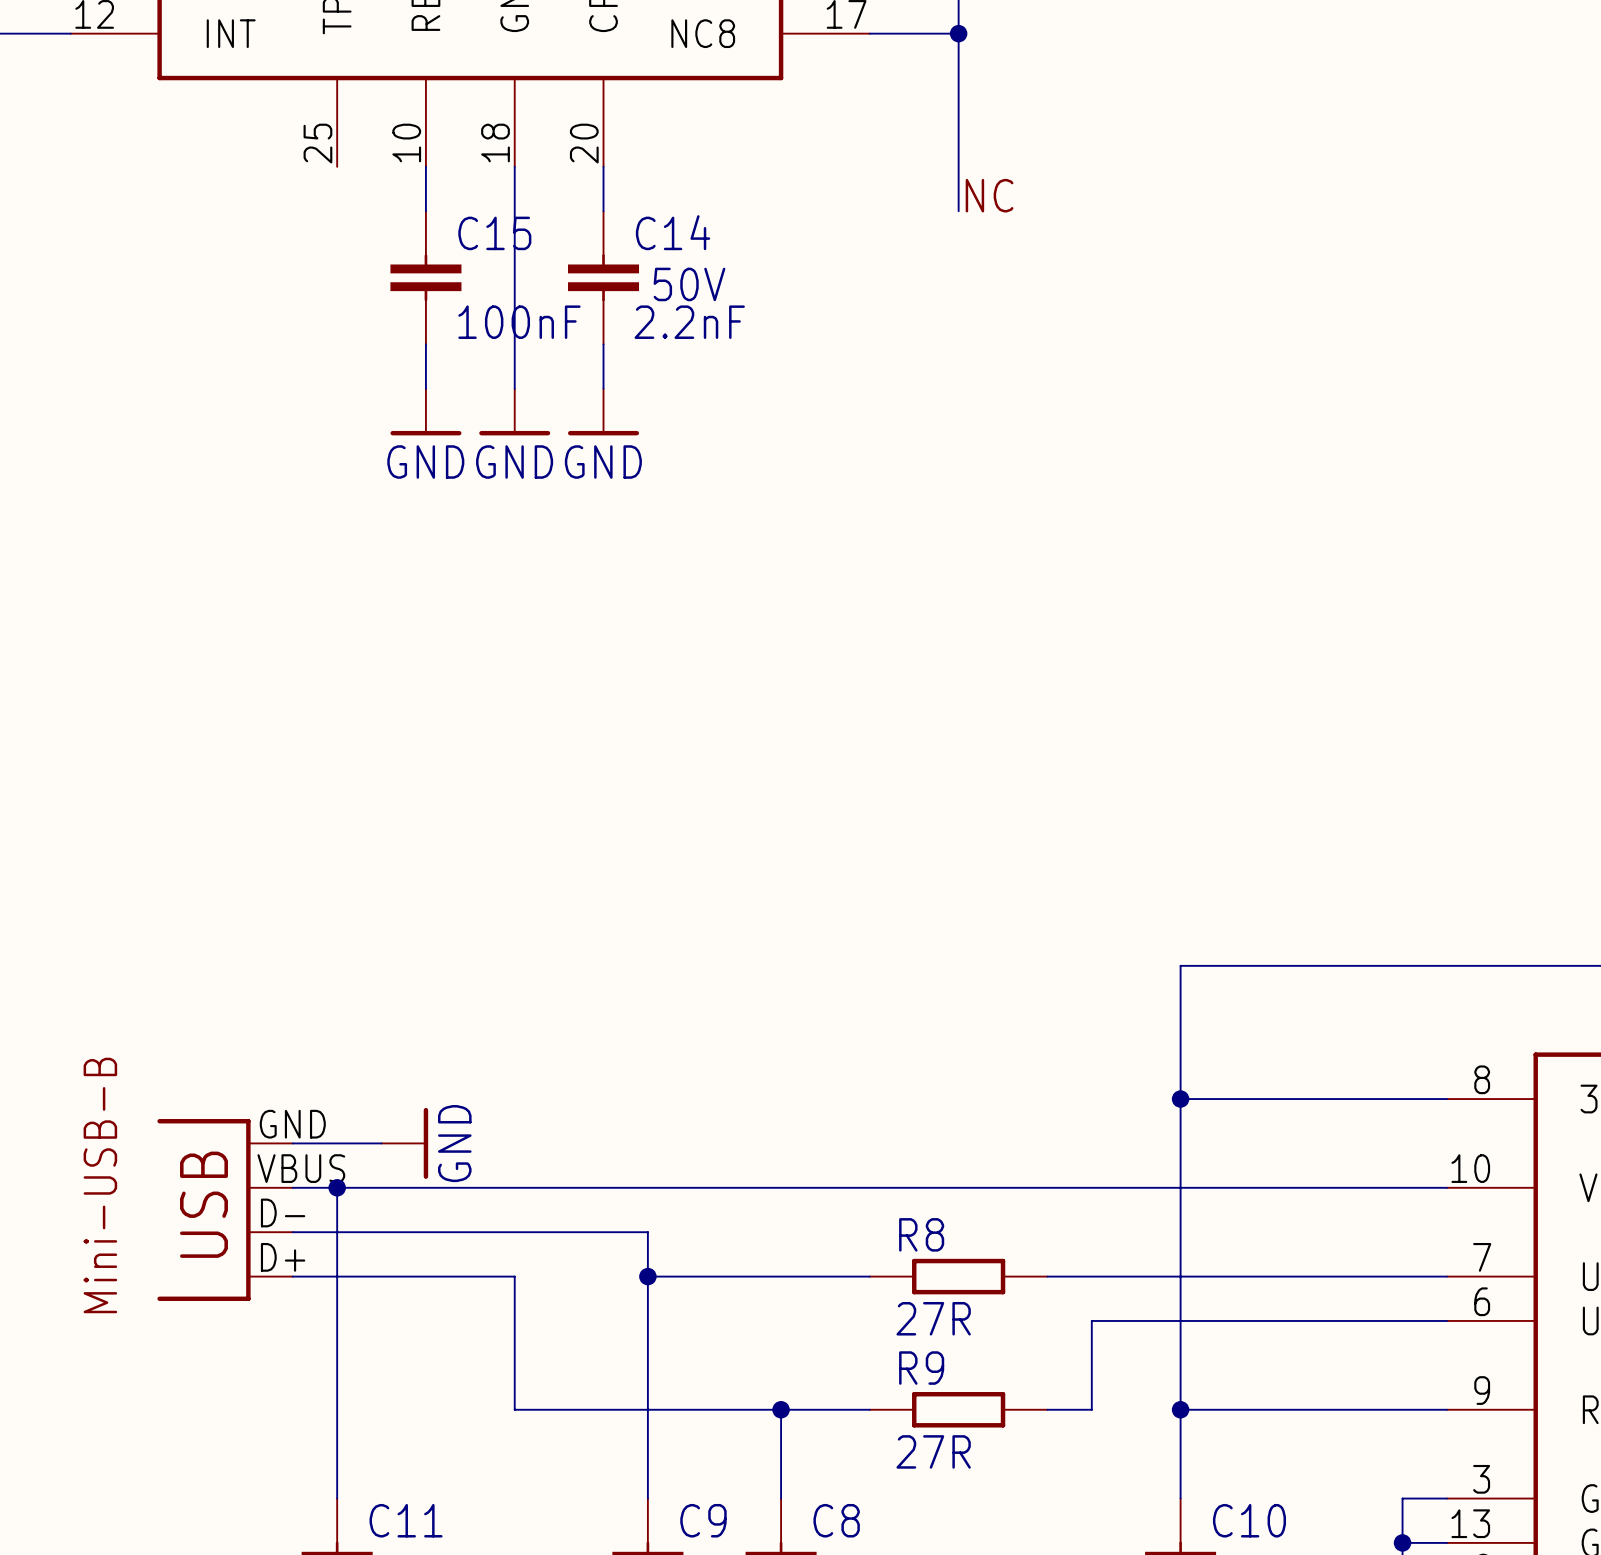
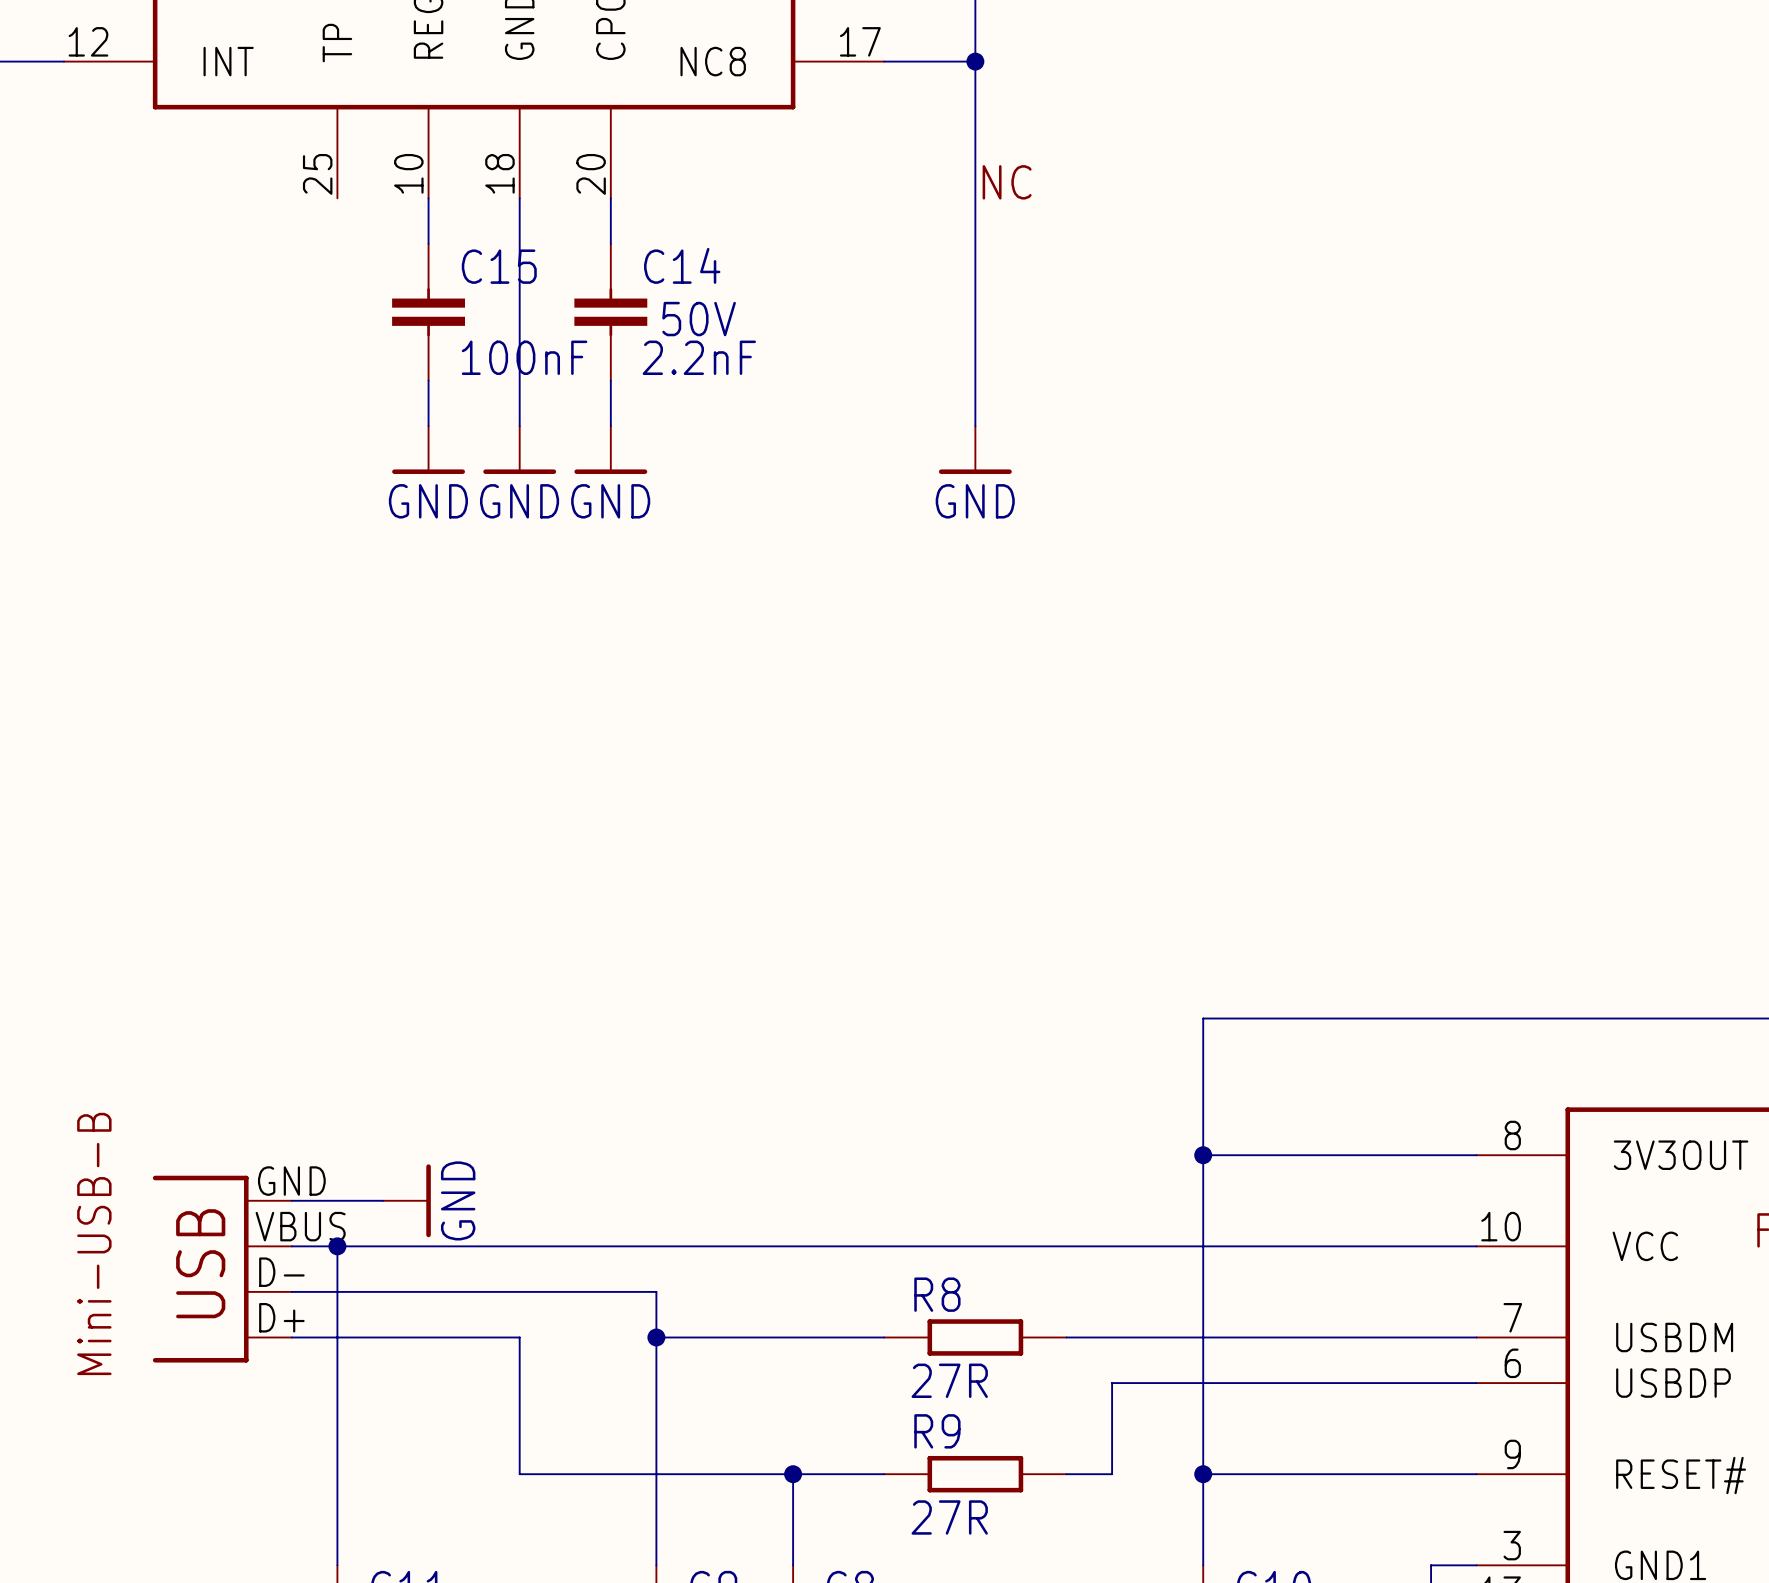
label position: NC (989, 195) -> NC (1007, 182)
wire: none -> (975, 243) (975, 426)
power symbol: none -> GND (975, 450)

